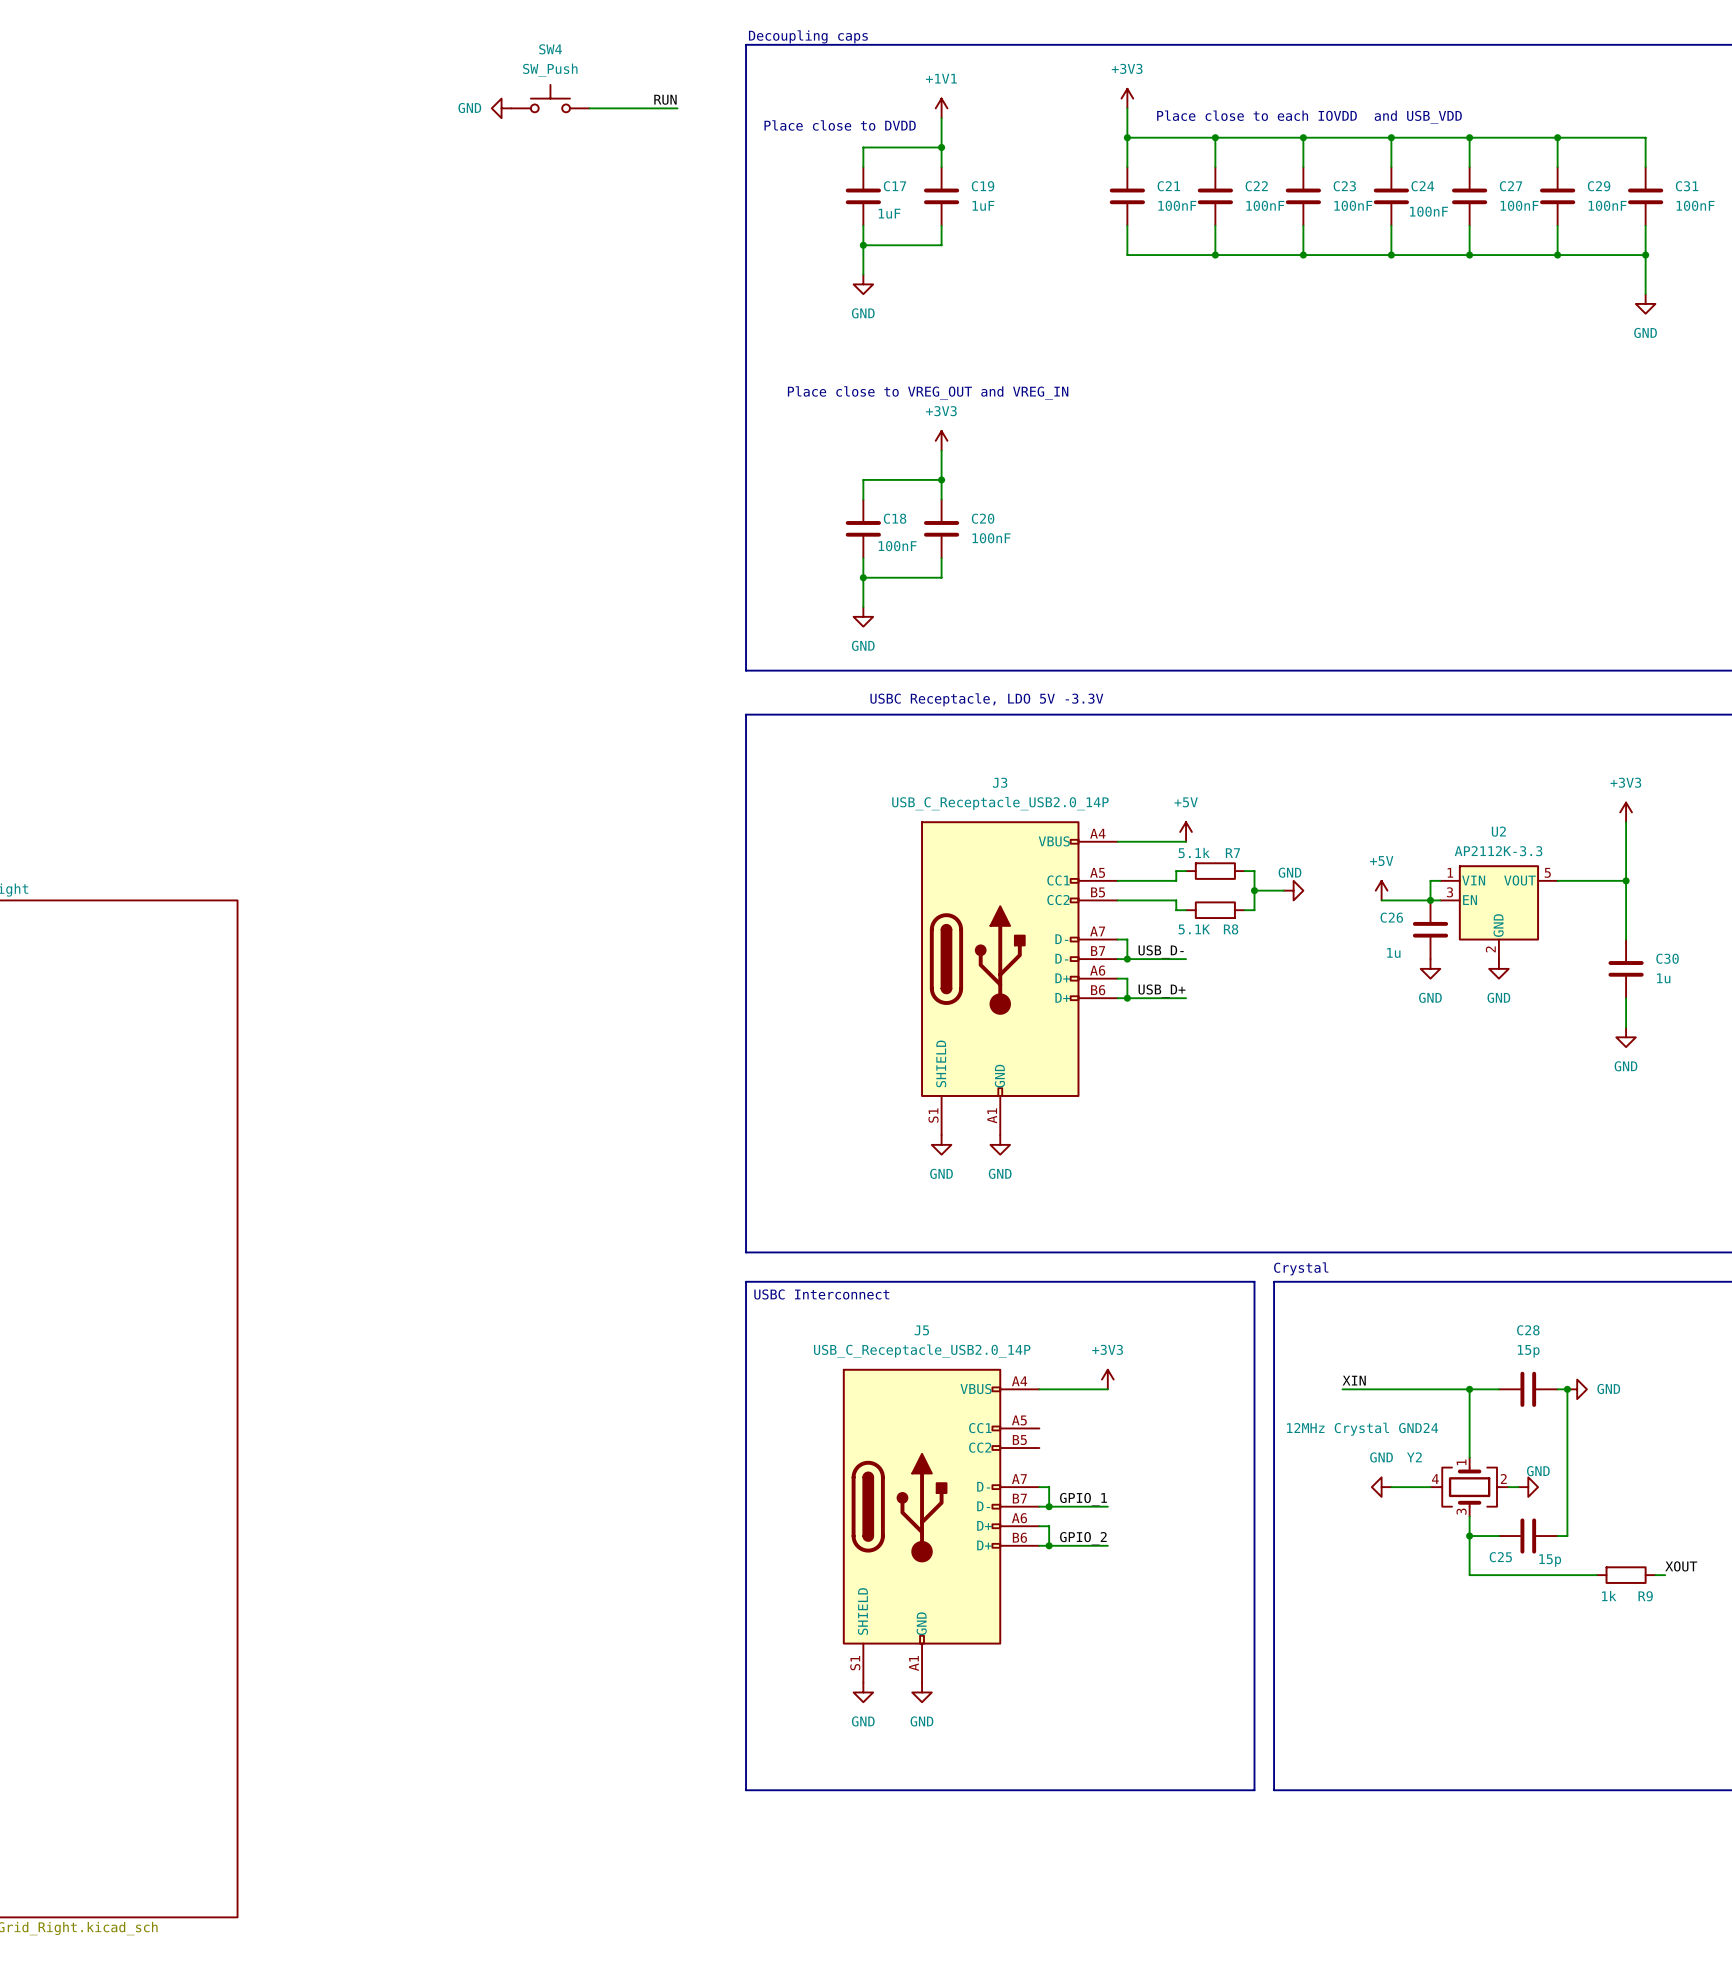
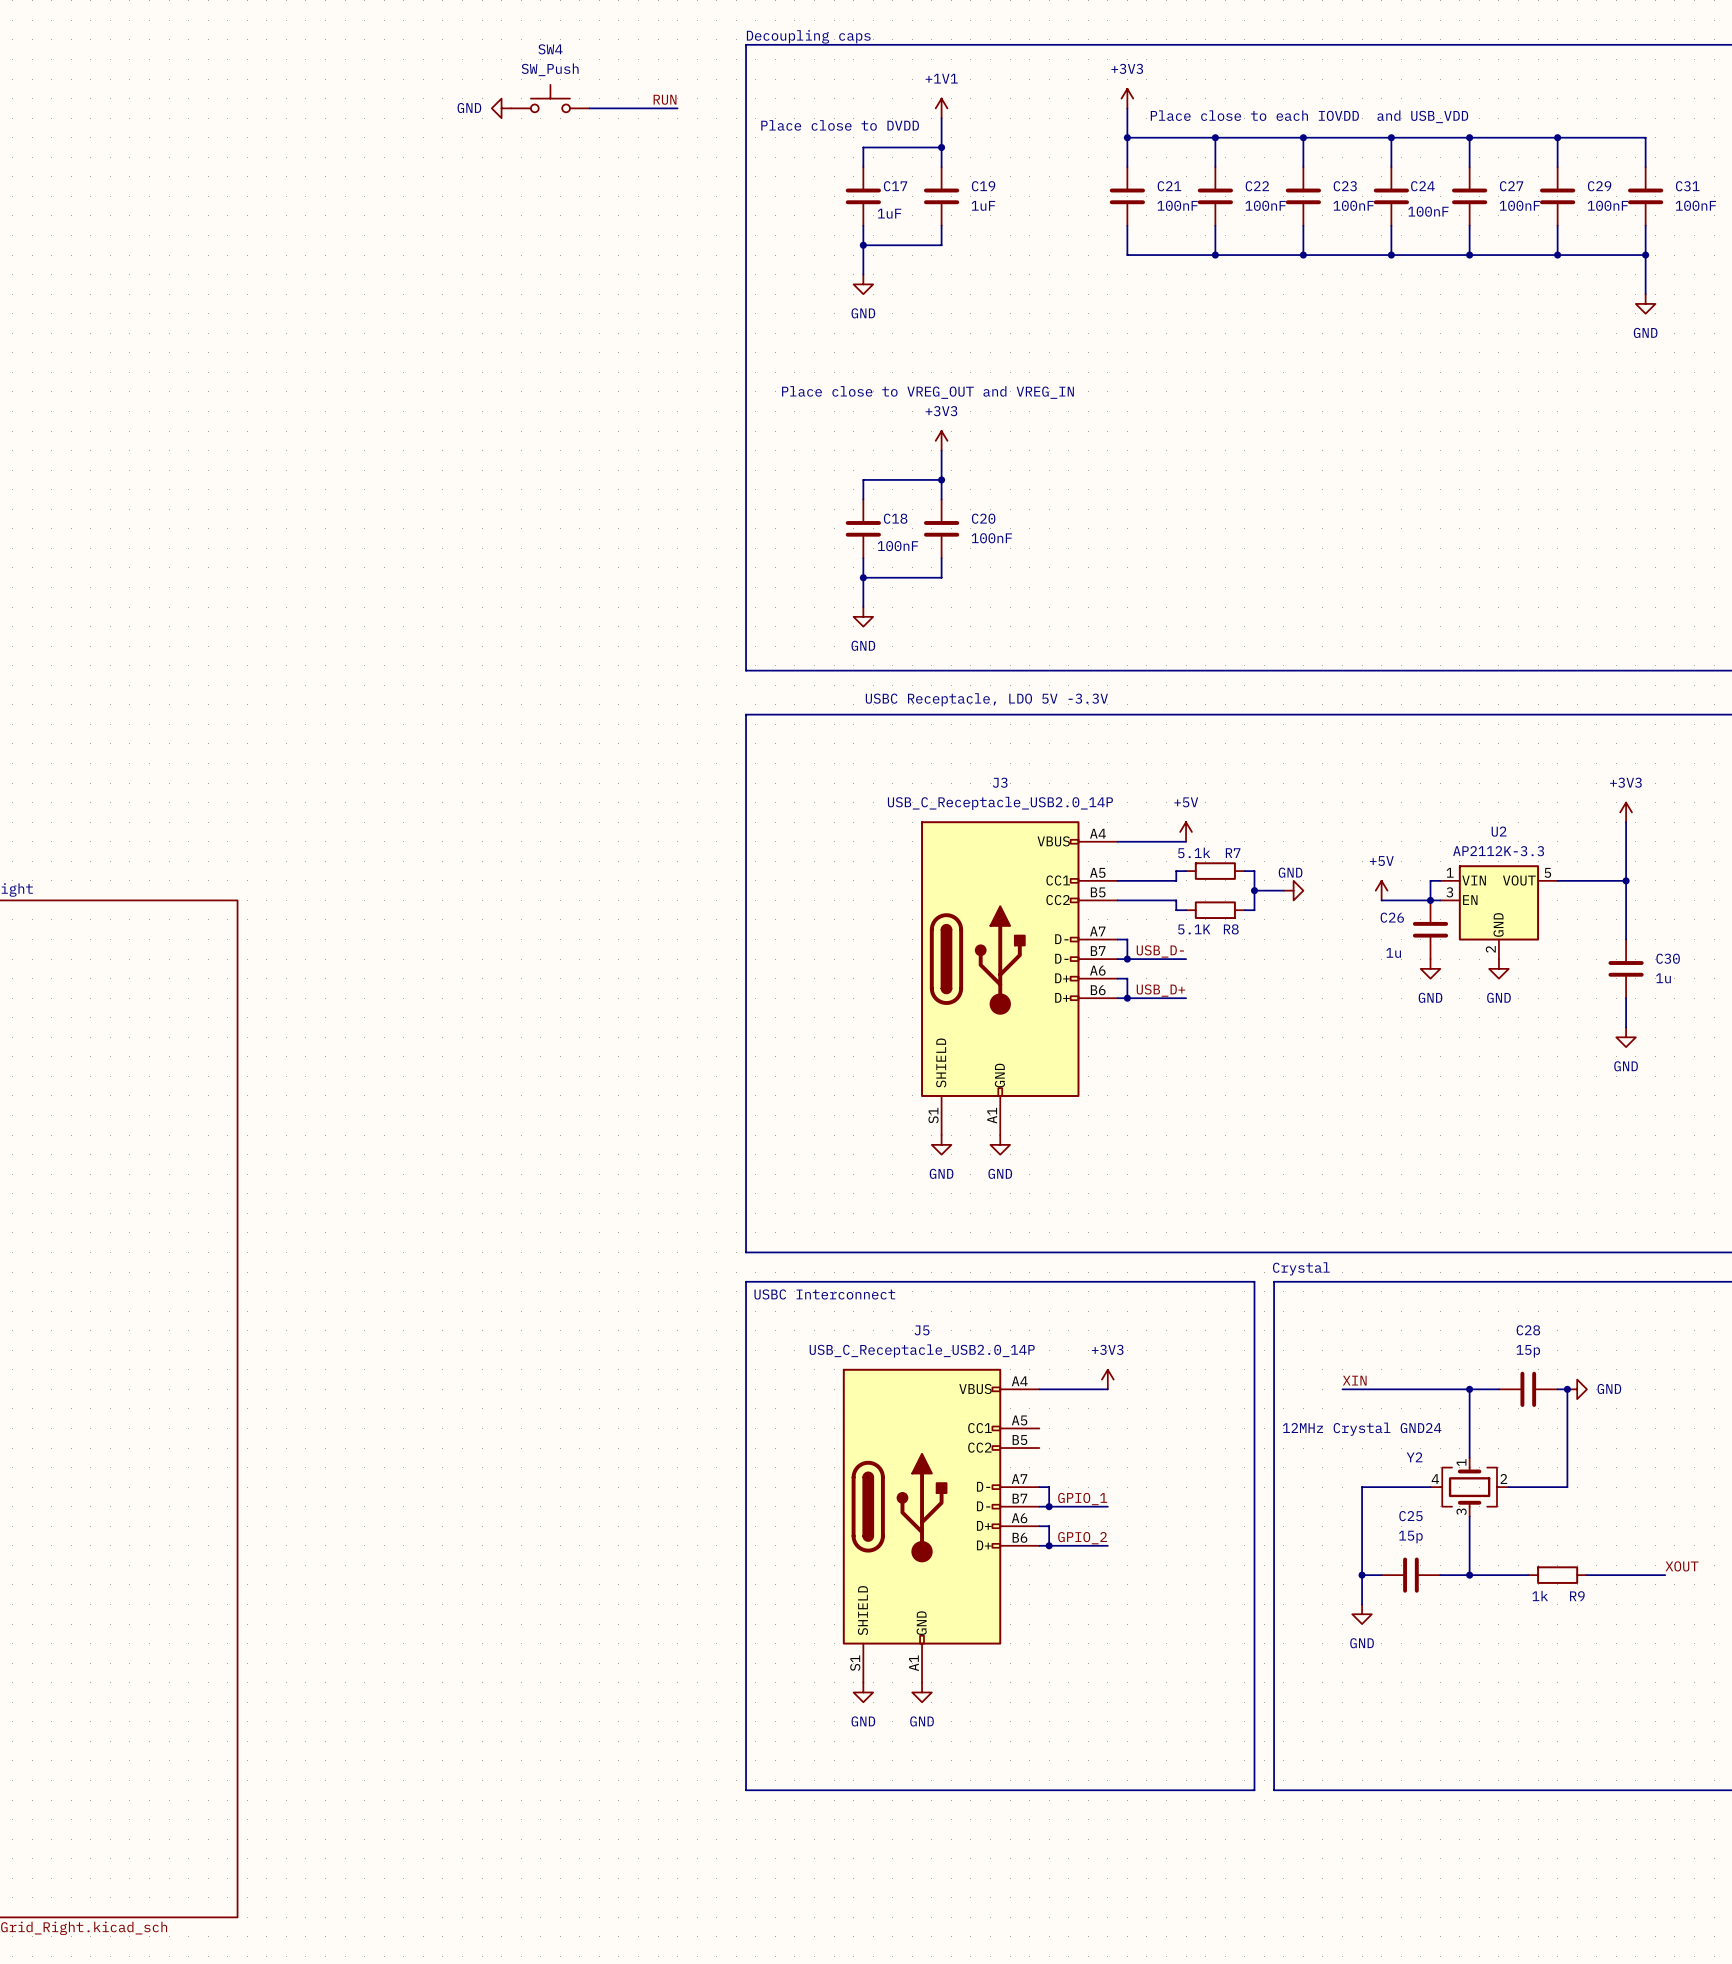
power symbol: GND (1381, 1487) -> none
wire: none -> (1391, 1487) (1362, 1487) (1362, 1604)
power symbol: GND (1528, 1487) -> none
wire: (1567, 1487) (1567, 1536) (1557, 1536) -> (1567, 1487) (1518, 1487)
wire: (1469, 1536) (1498, 1536) -> (1440, 1575) (1469, 1575)
junction position: (1469, 1536) -> (1469, 1575)
C25 position: (1528, 1536) -> (1410, 1575)
C25 name position: C25 (1500, 1557) -> C25 (1410, 1516)
C25 value position: 15p (1550, 1560) -> 15p (1410, 1537)
wire: none -> (1362, 1575) (1381, 1575)
junction: none -> (1362, 1575)
wire: (1528, 1575) (1586, 1575) -> (1596, 1575) (1655, 1575)
R9 position: (1626, 1575) -> (1557, 1575)
power symbol: none -> GND (1362, 1614)

